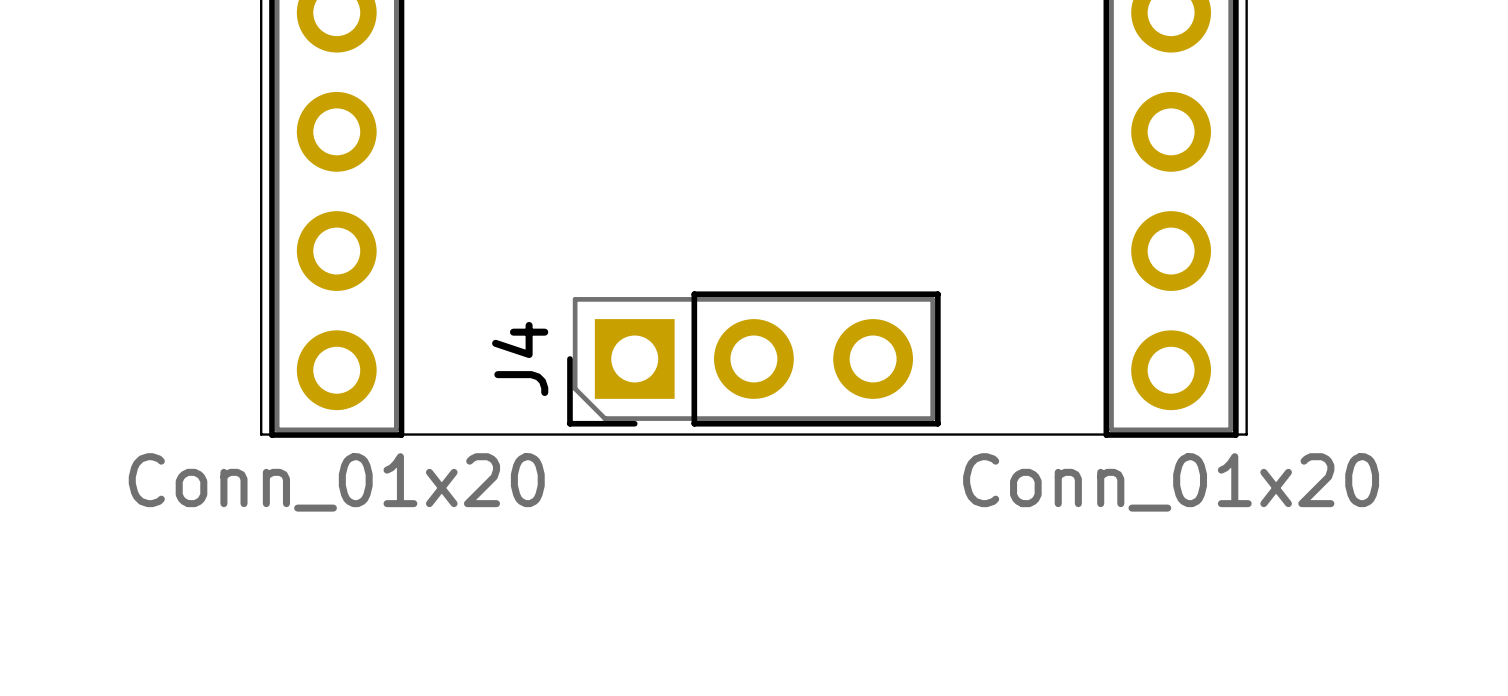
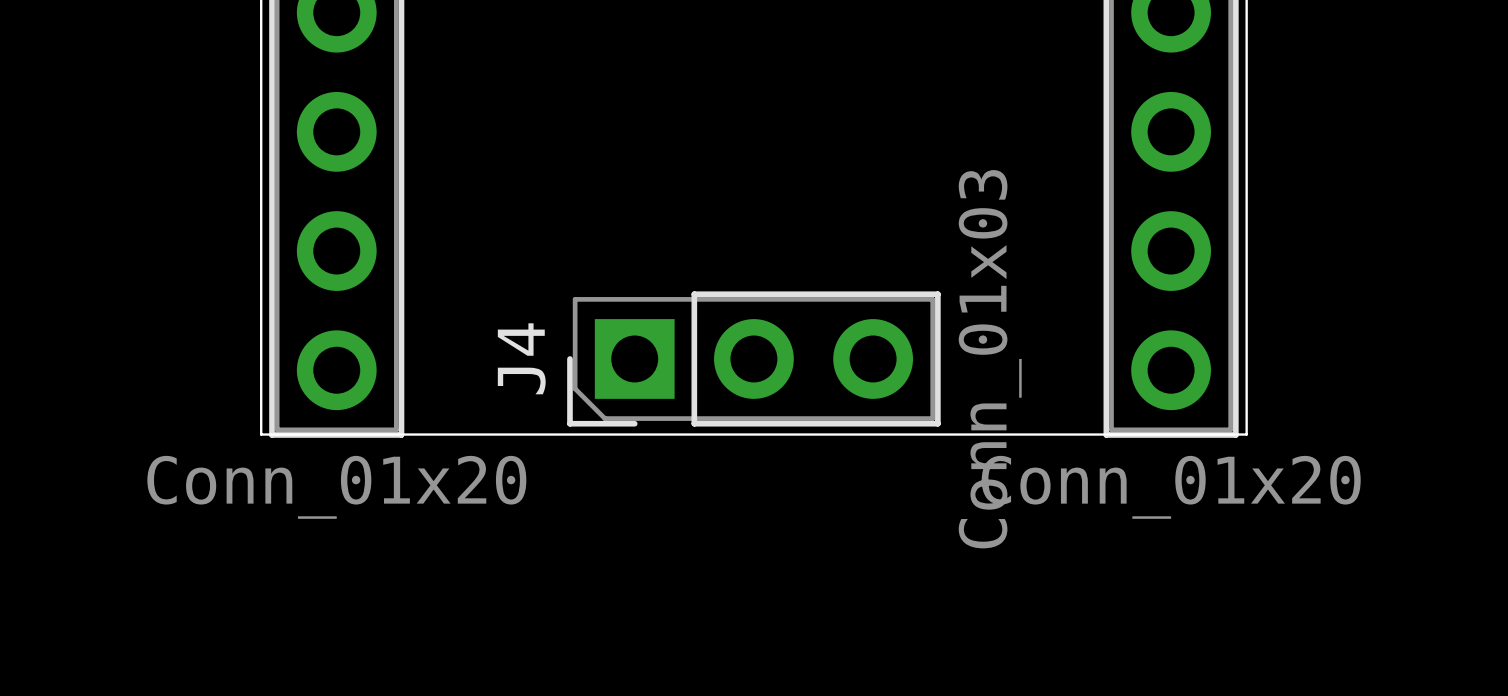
J4 value: none -> Conn_01x03 (990, 359)

